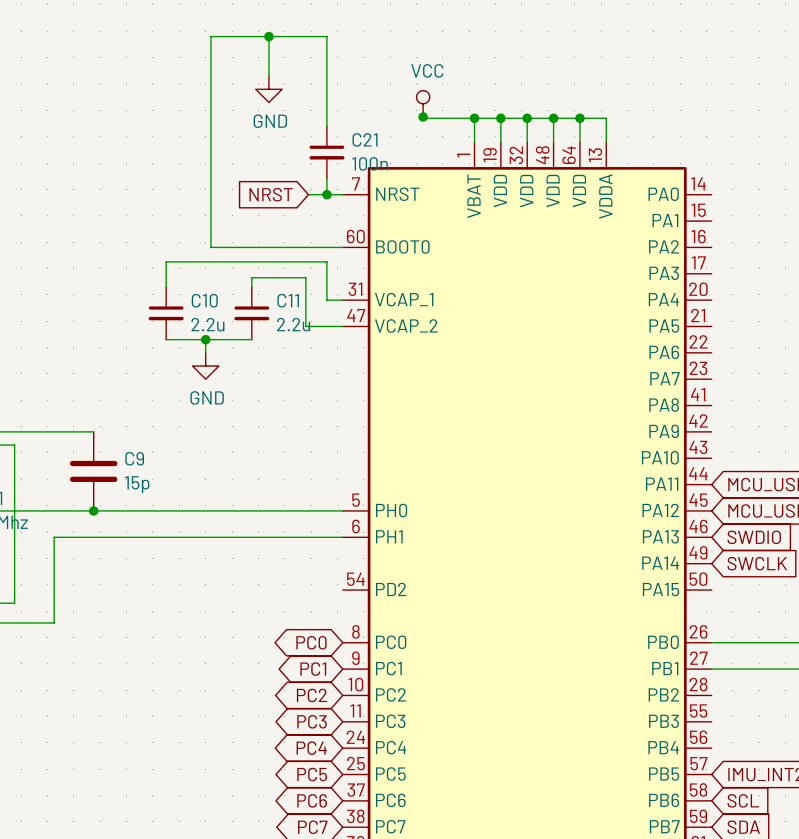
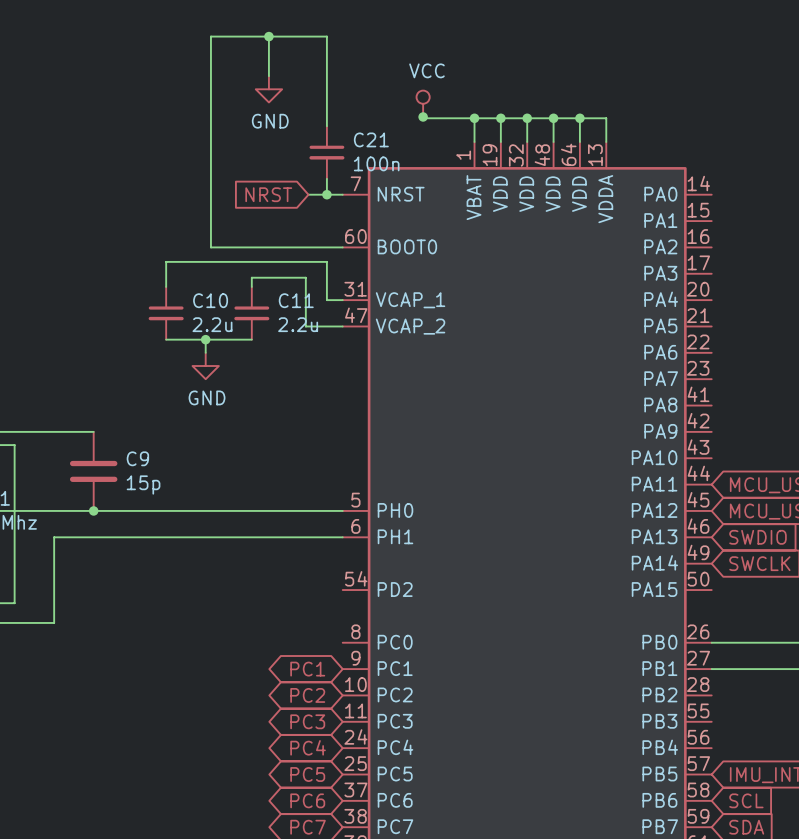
global label: PC0 (311, 642) -> none

